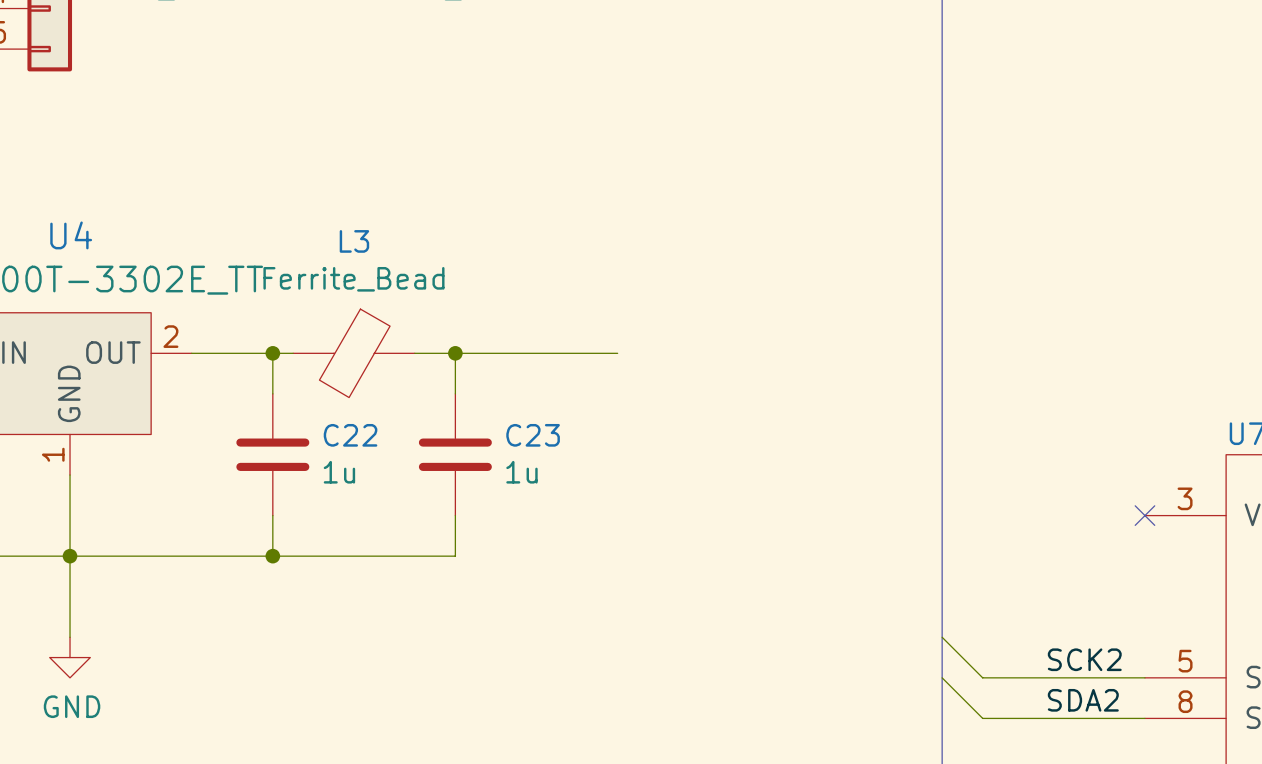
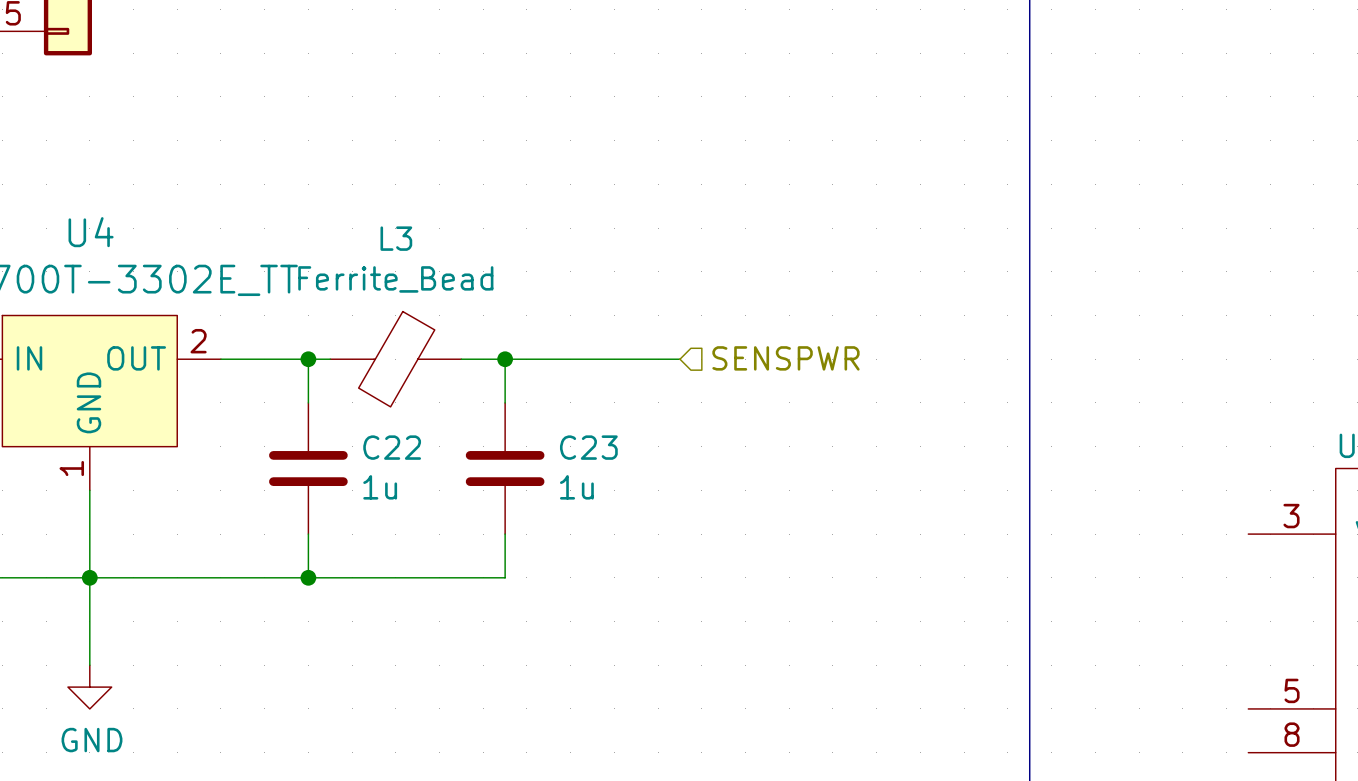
hierarchical label: none -> SENSPWR (785, 358)
no-connect mark: (1144, 515) -> none
wire: (942, 637) (982, 677) (1144, 677) -> none
label: SCK2 (1084, 659) -> none
wire: (942, 677) (982, 718) (1144, 718) -> none
label: SDA2 (1083, 700) -> none

